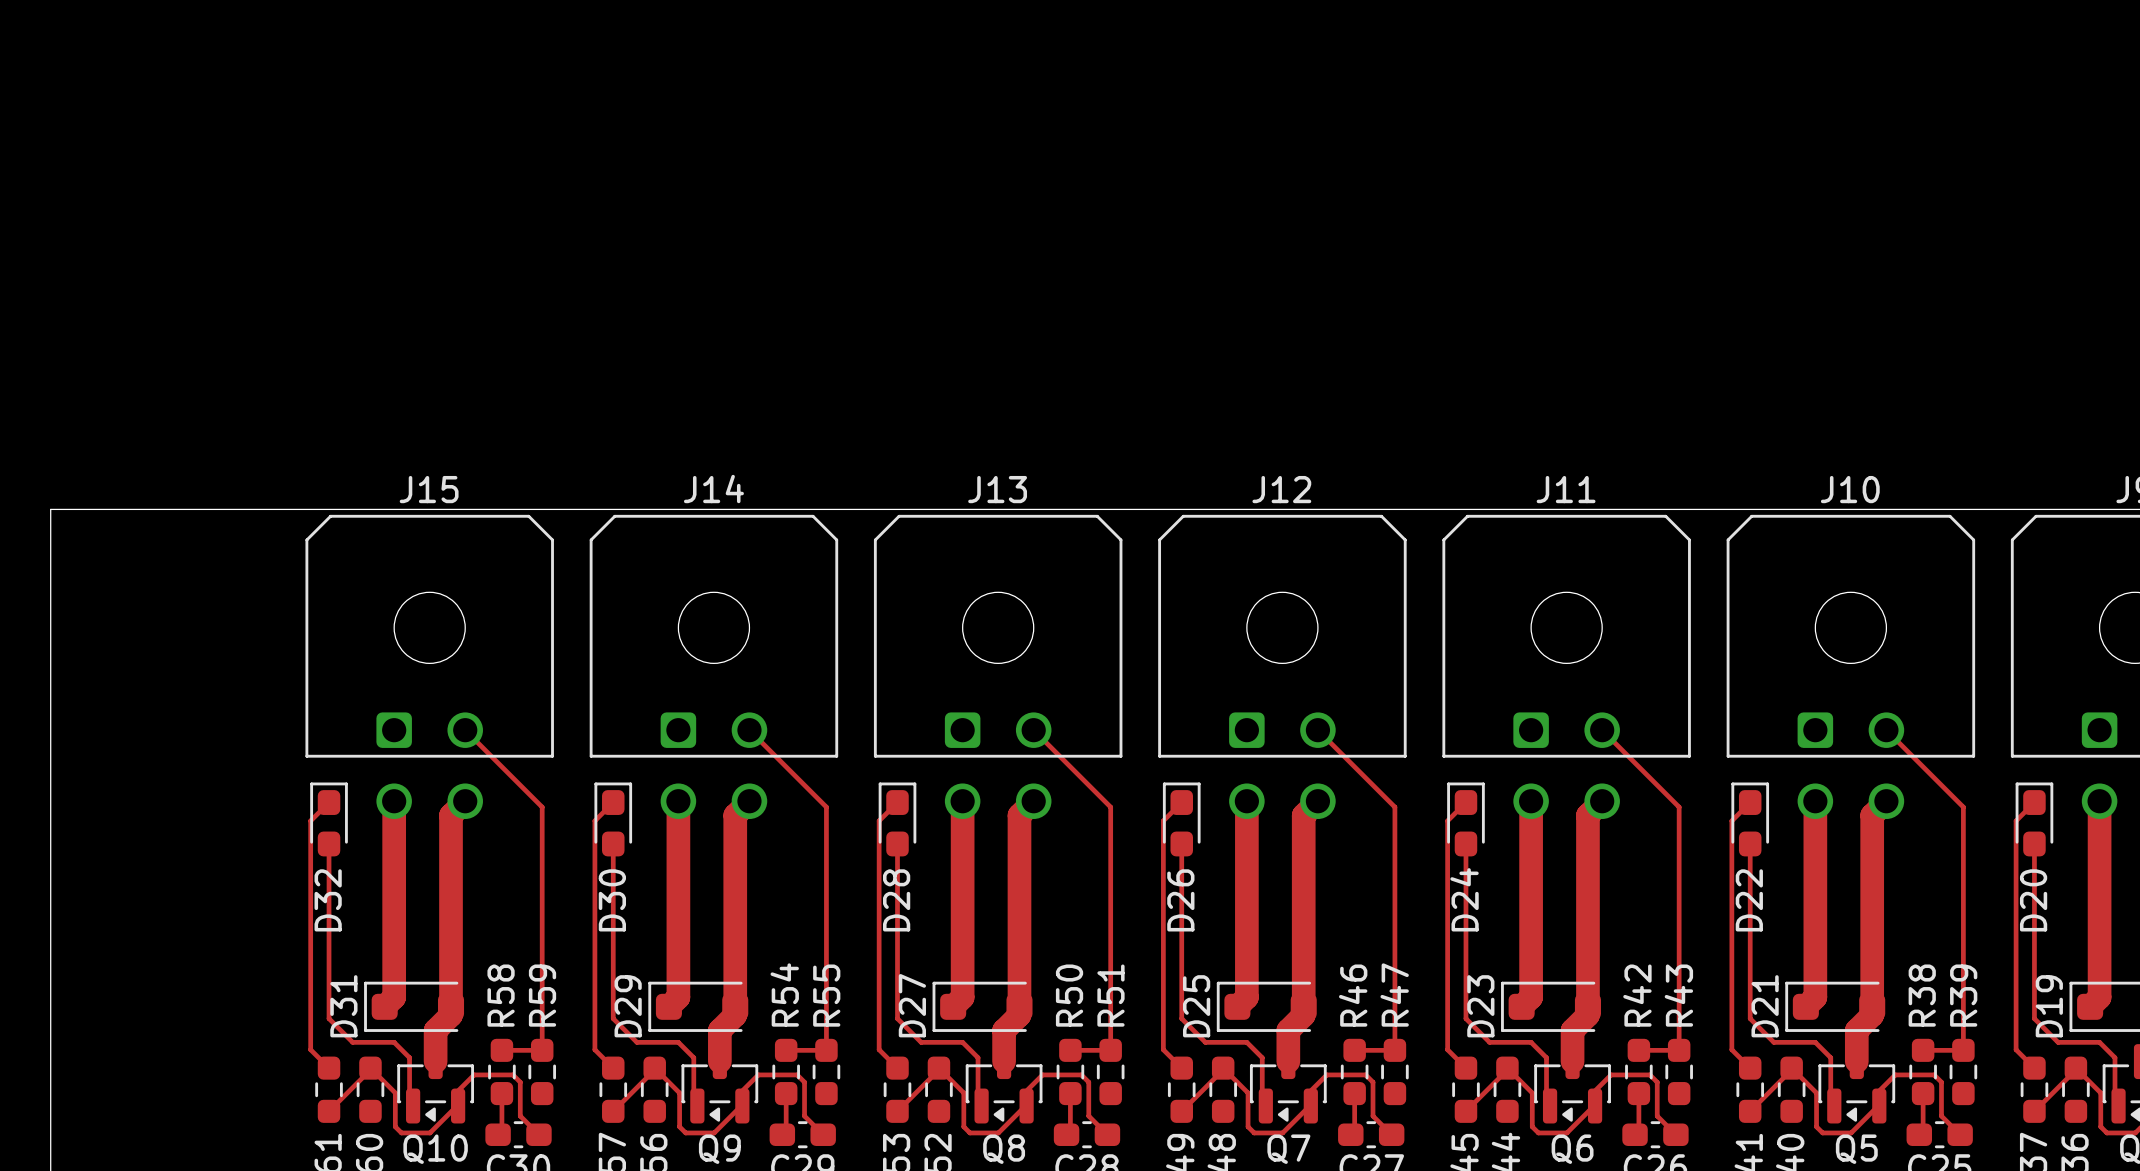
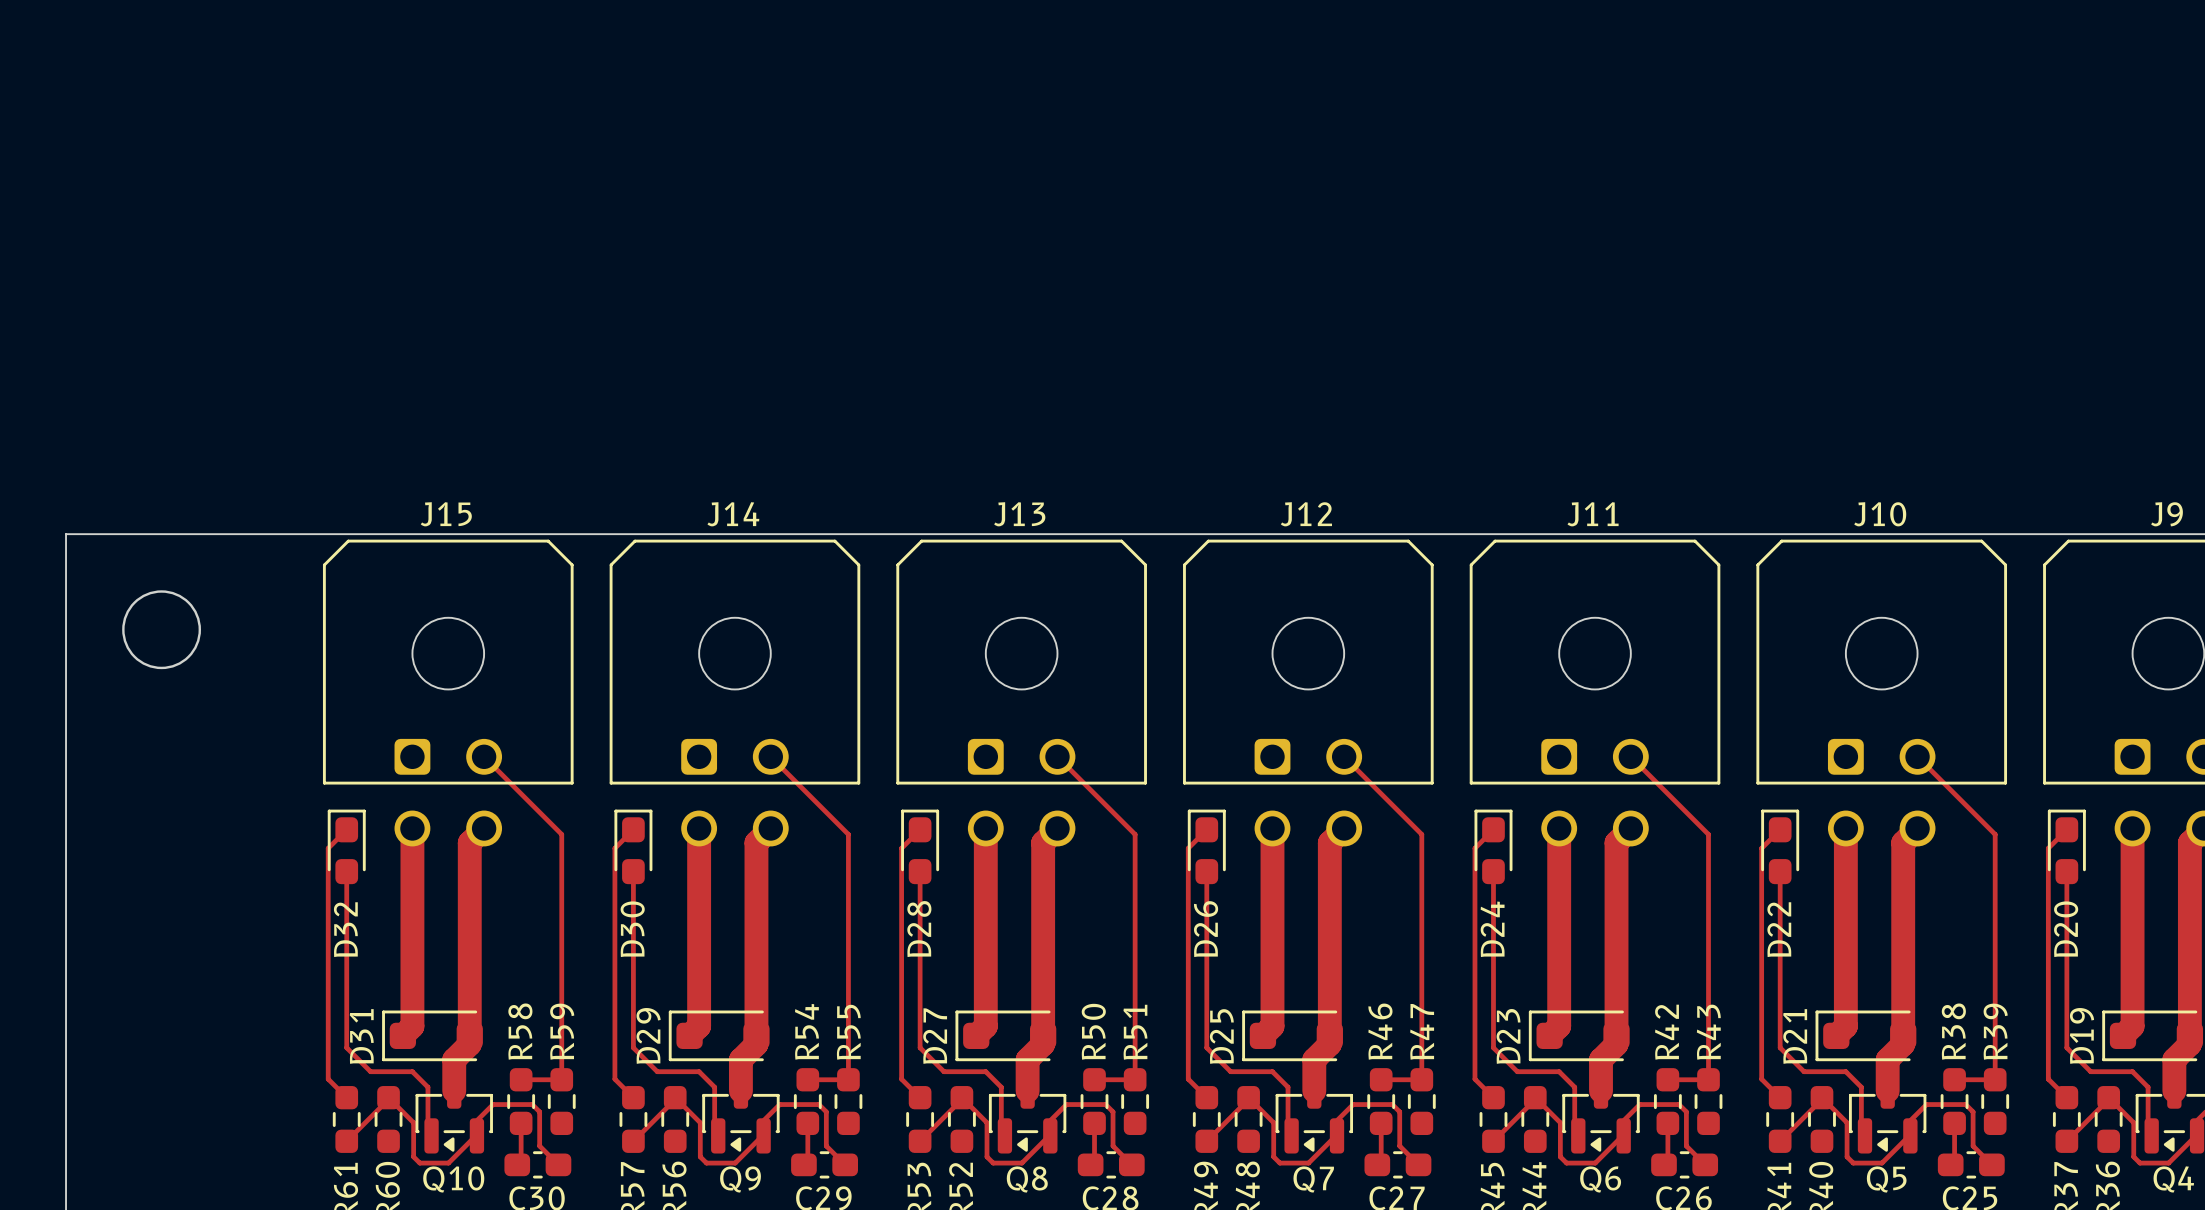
round board edge: none -> [122, 590, 202, 670]

